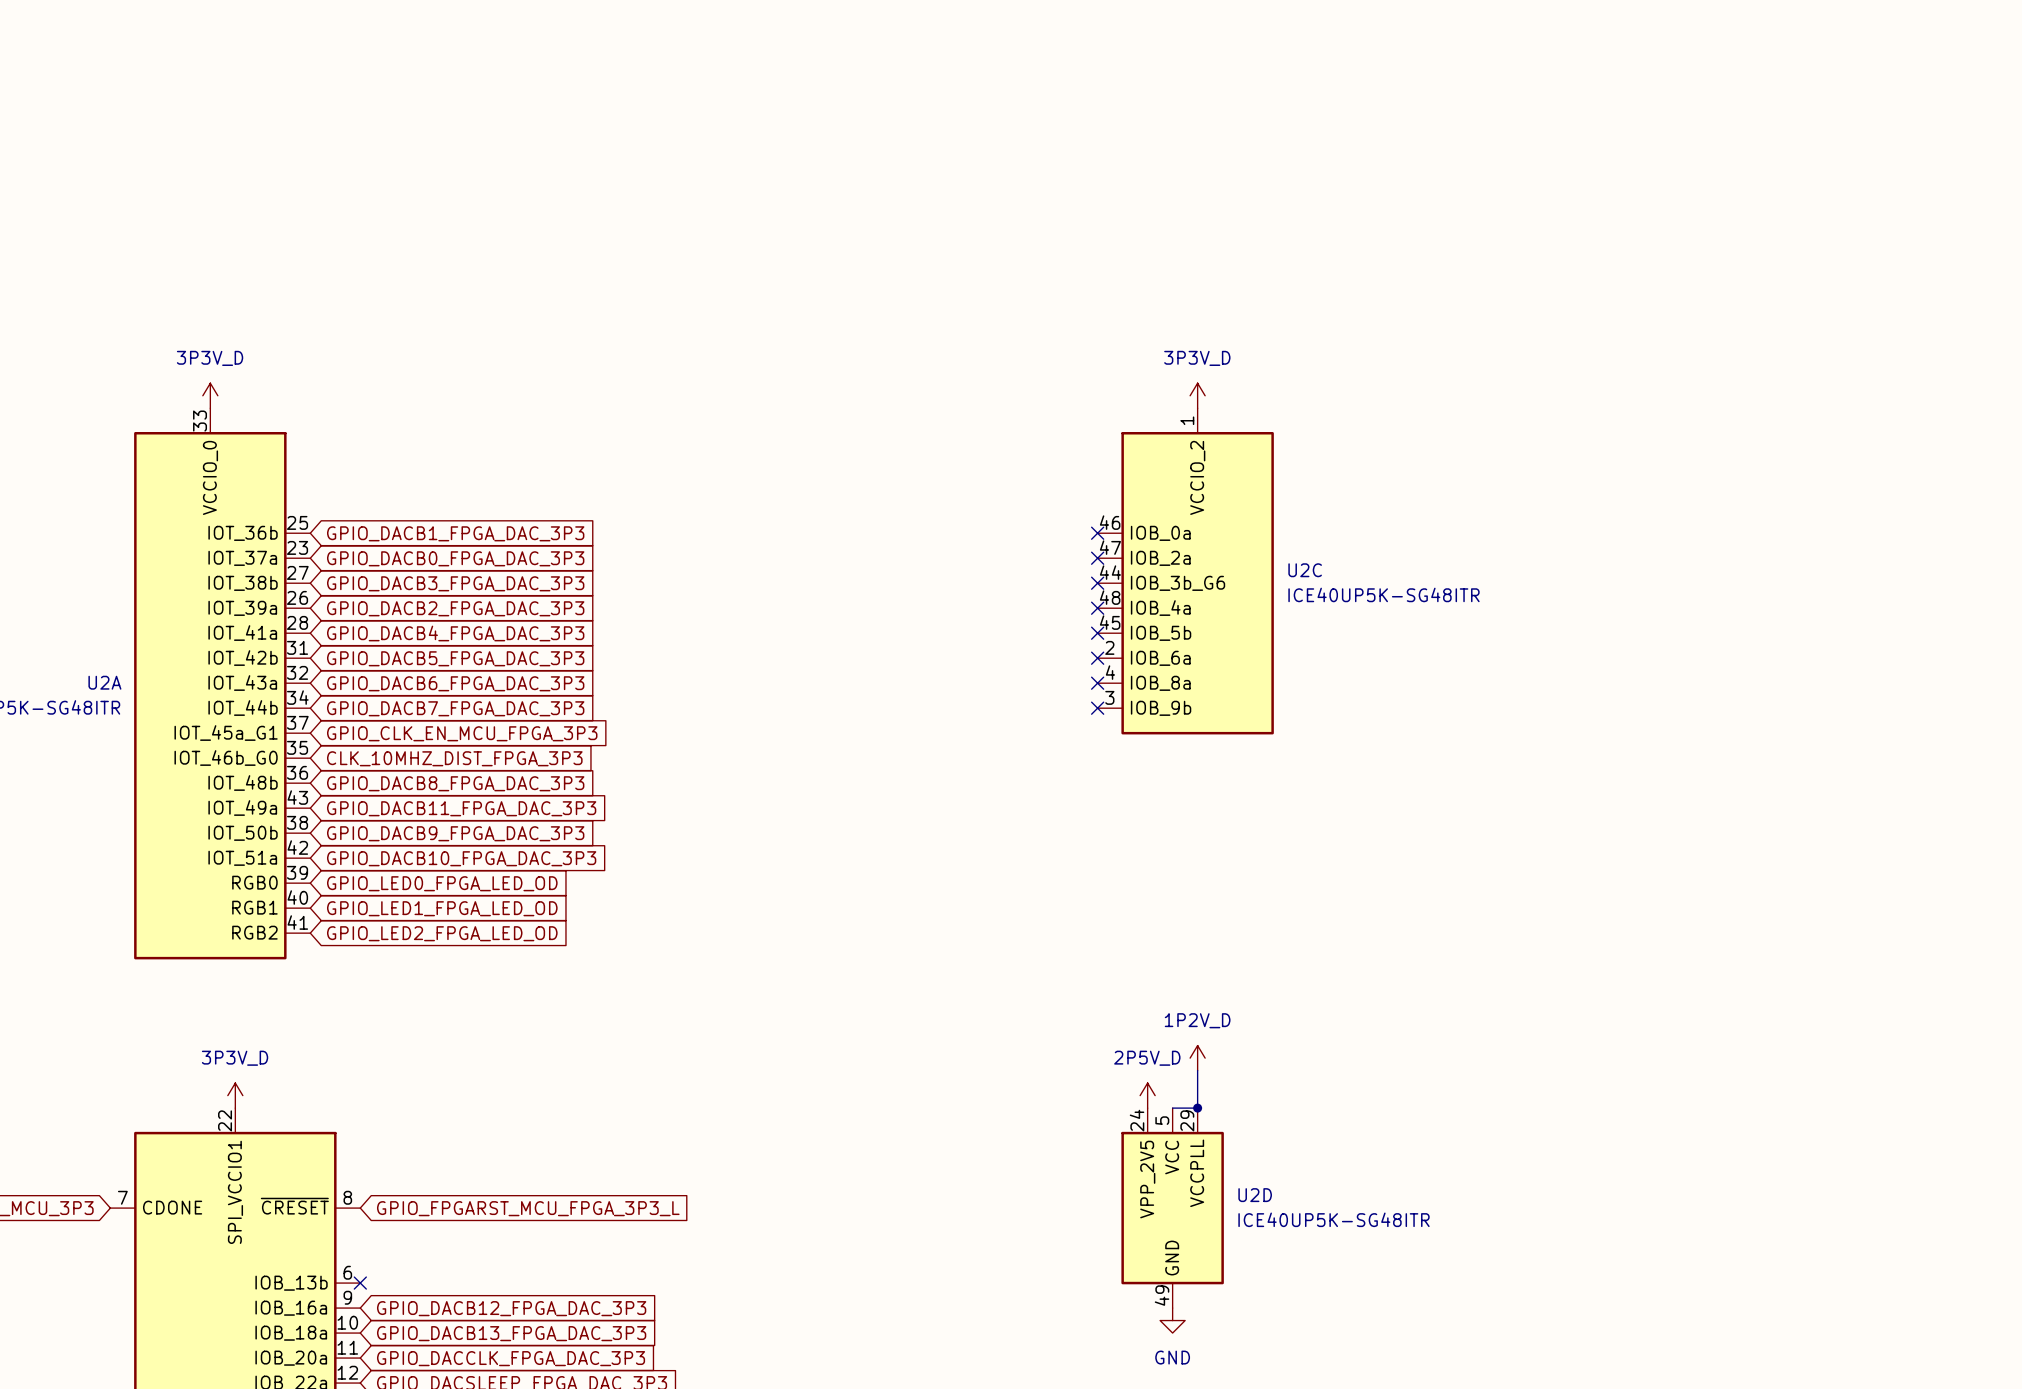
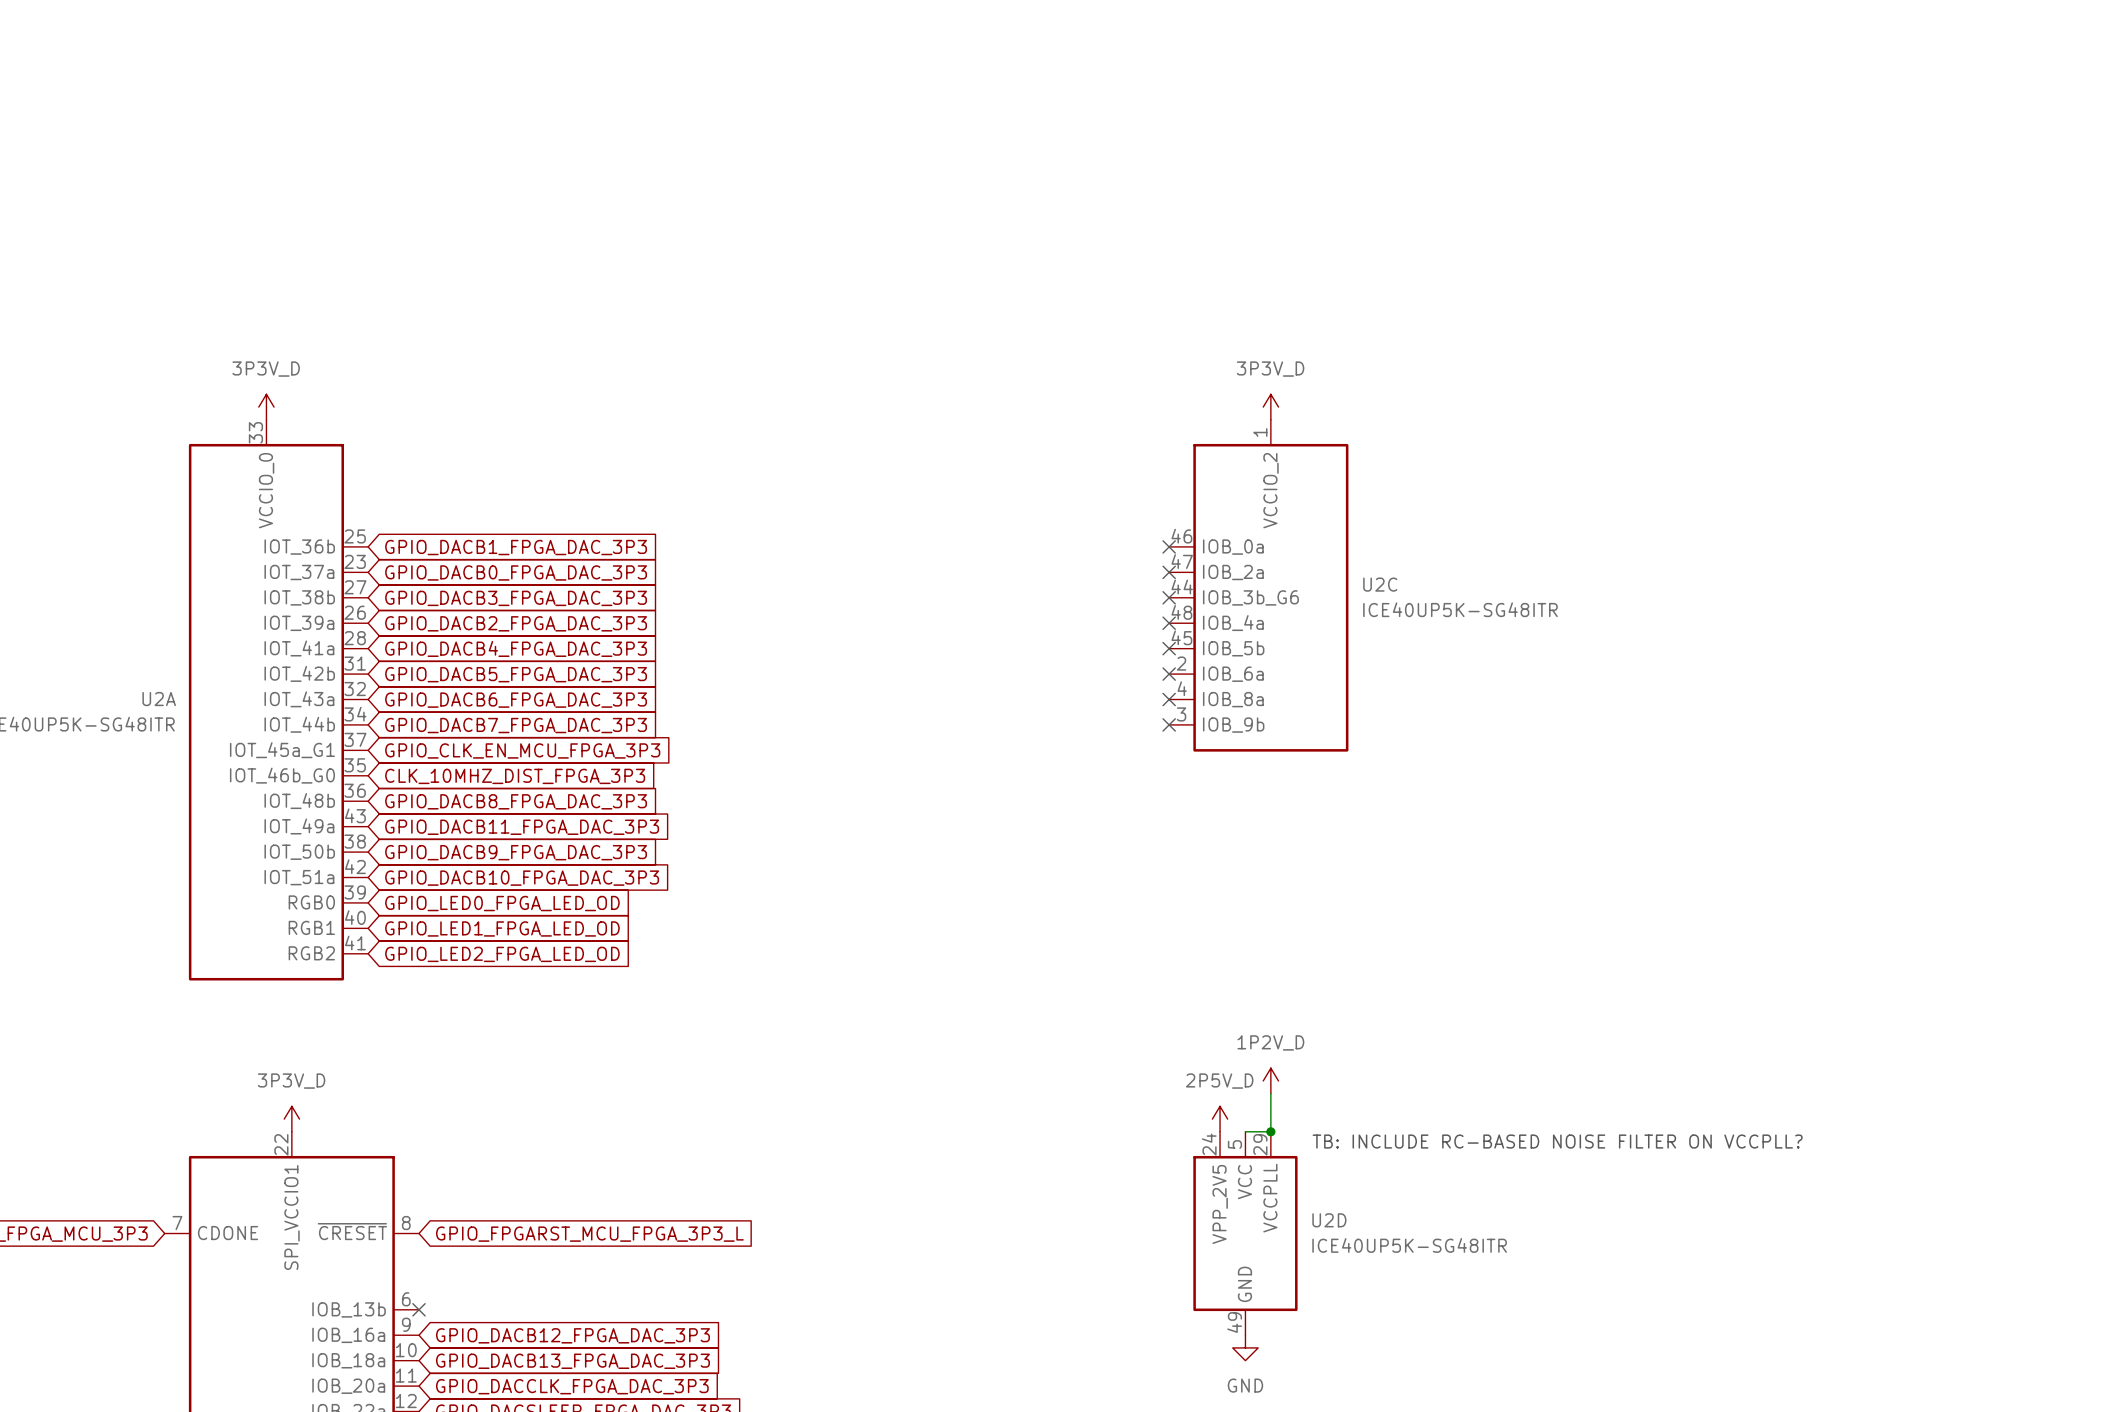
text: none -> TB: INCLUDE RC-BASED NOISE FILTER ON VCCPLL? (1557, 1141)

